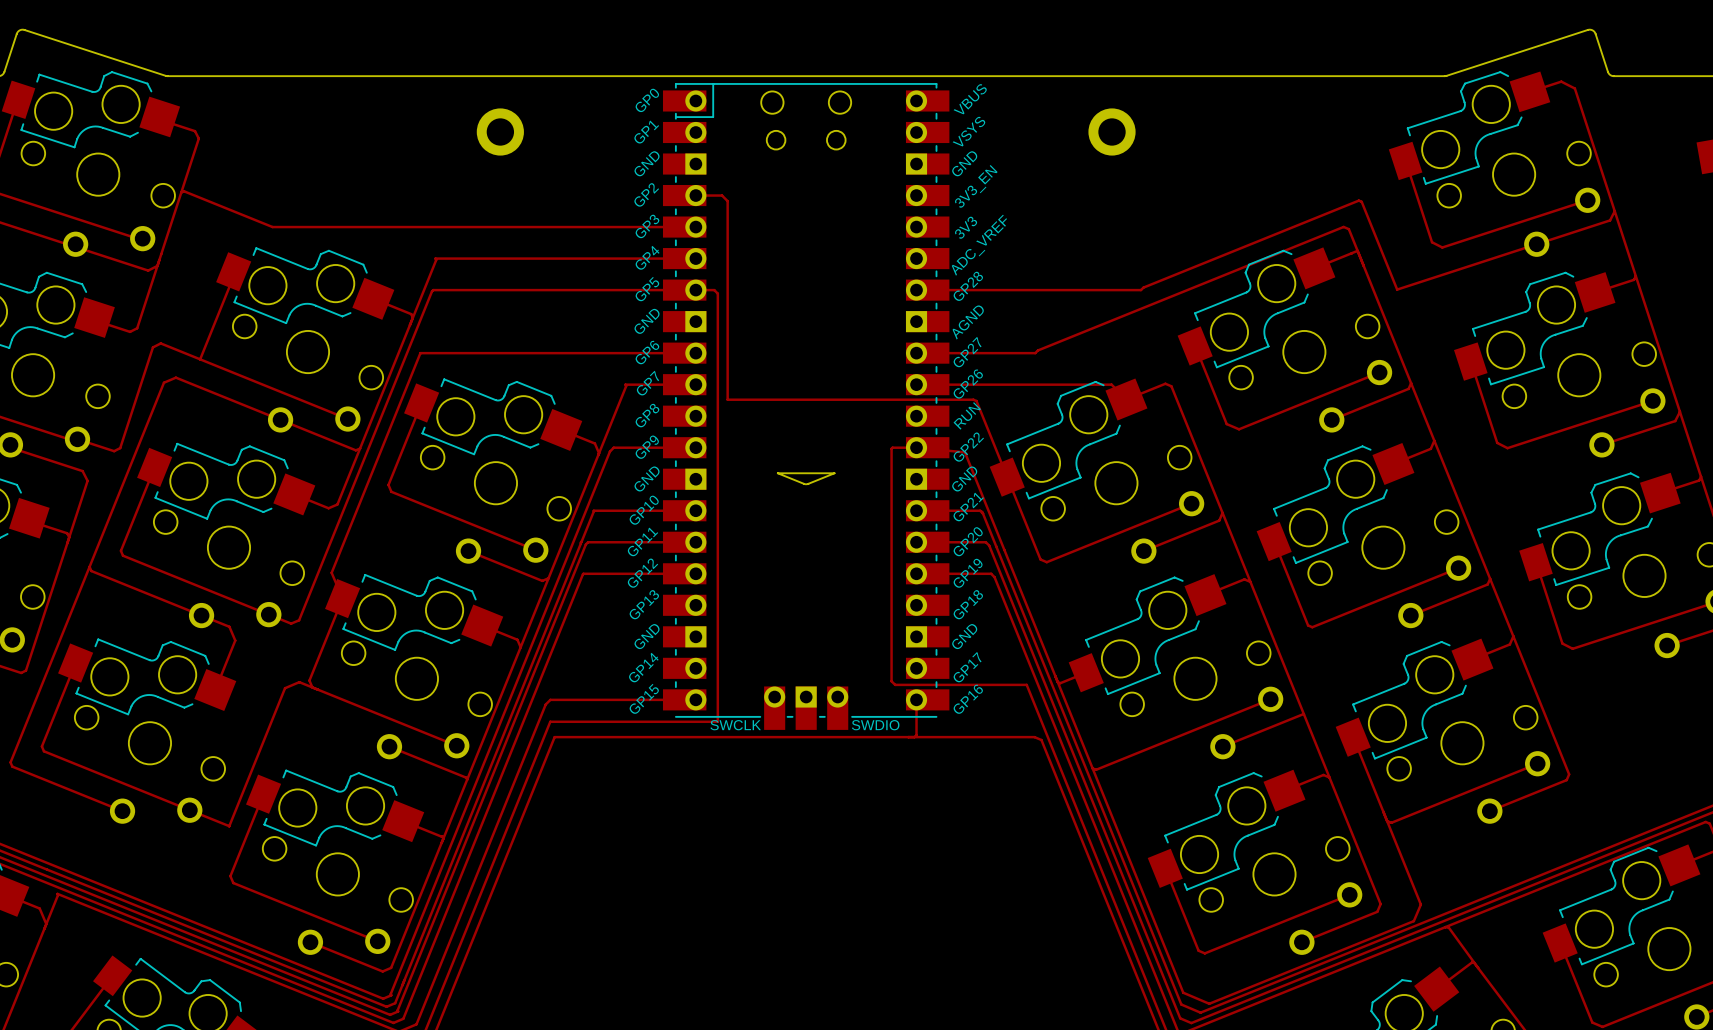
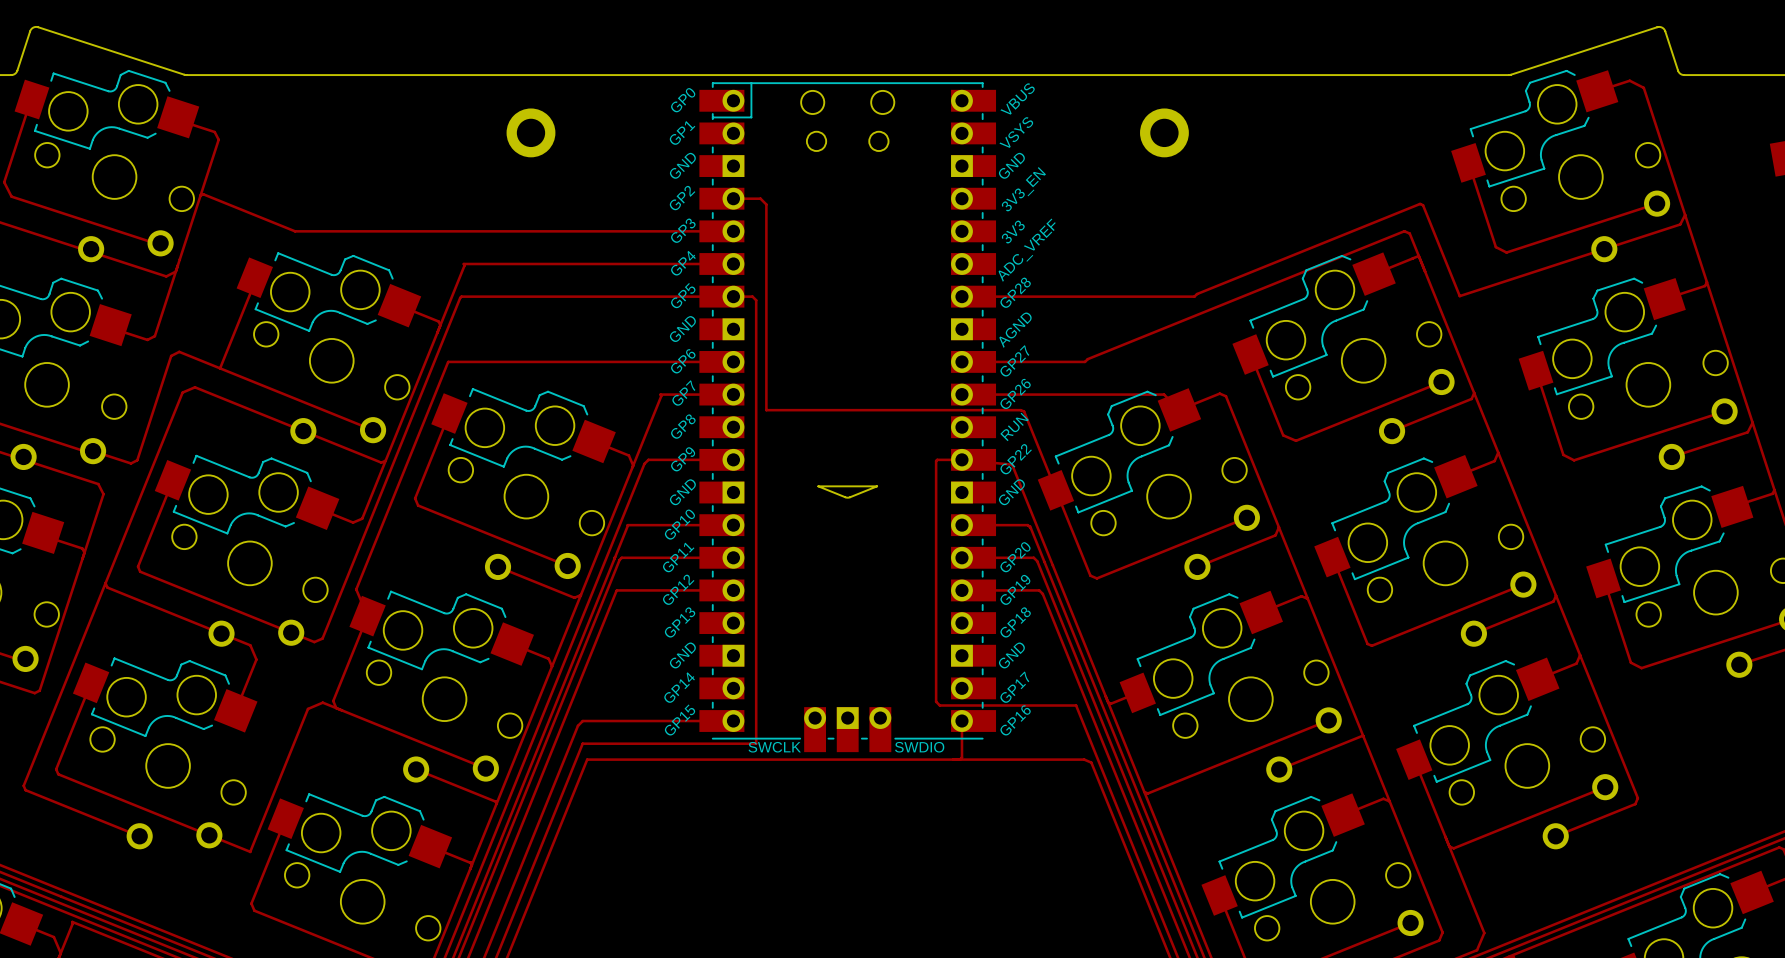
text: GP21 (968, 507) -> none

